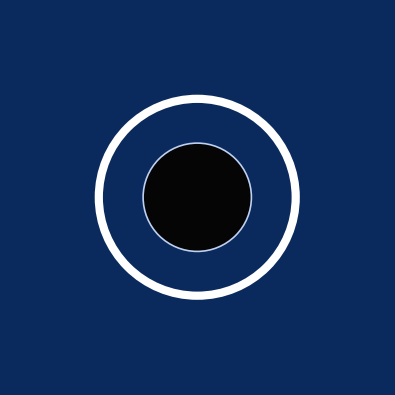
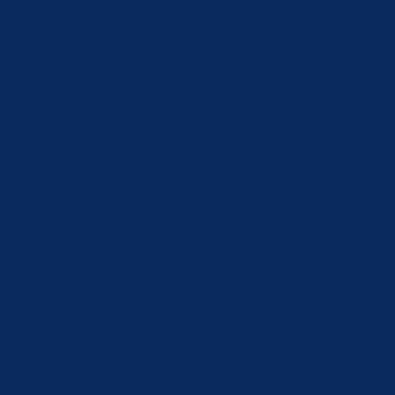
part: (197, 197) -> none

